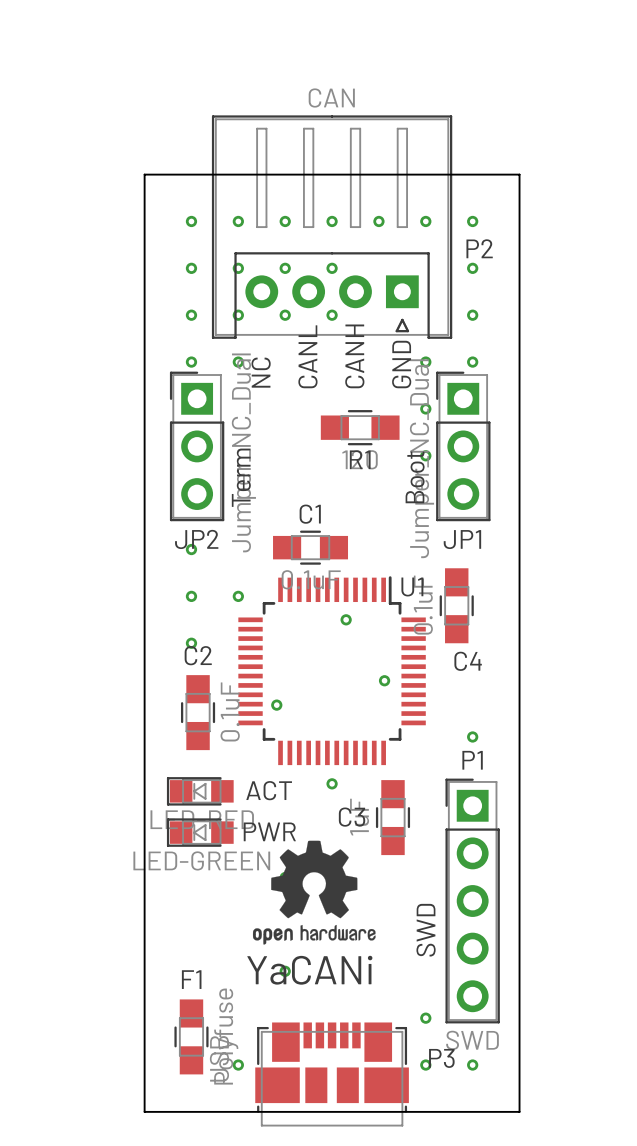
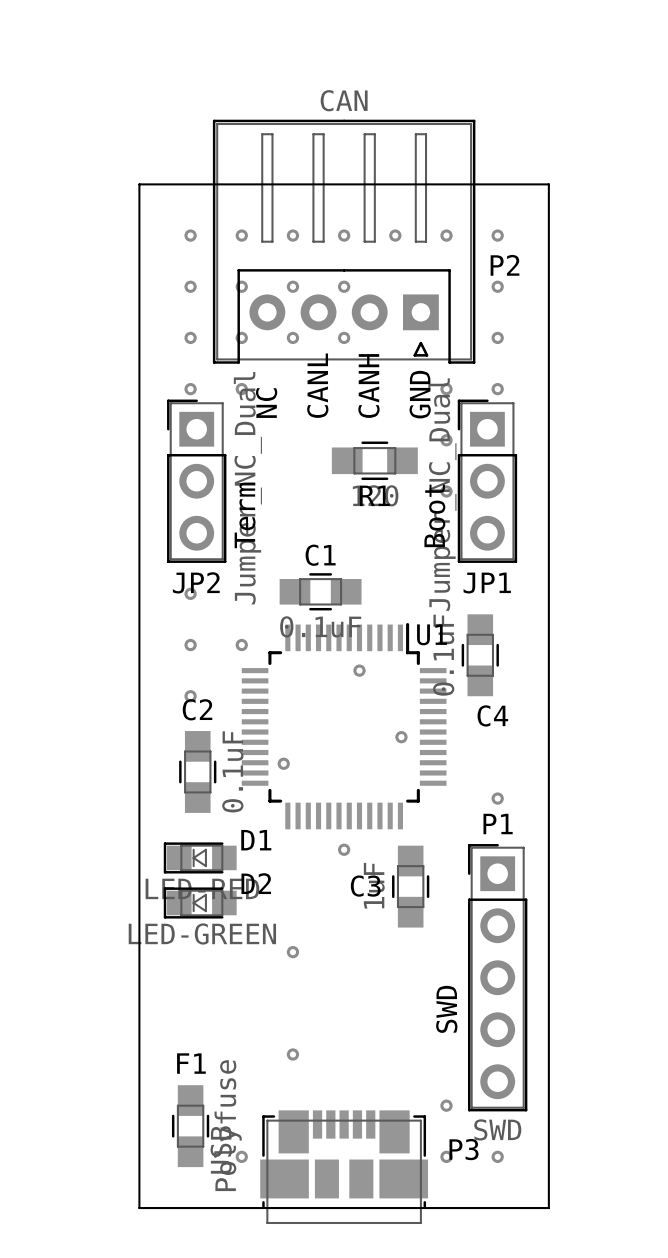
ACT name: ACT (269, 790) -> D1 (256, 840)
PWR name: PWR (269, 831) -> D2 (256, 883)
drawing: [252, 840, 376, 945] -> none
text: YaCANi (309, 970) -> none

